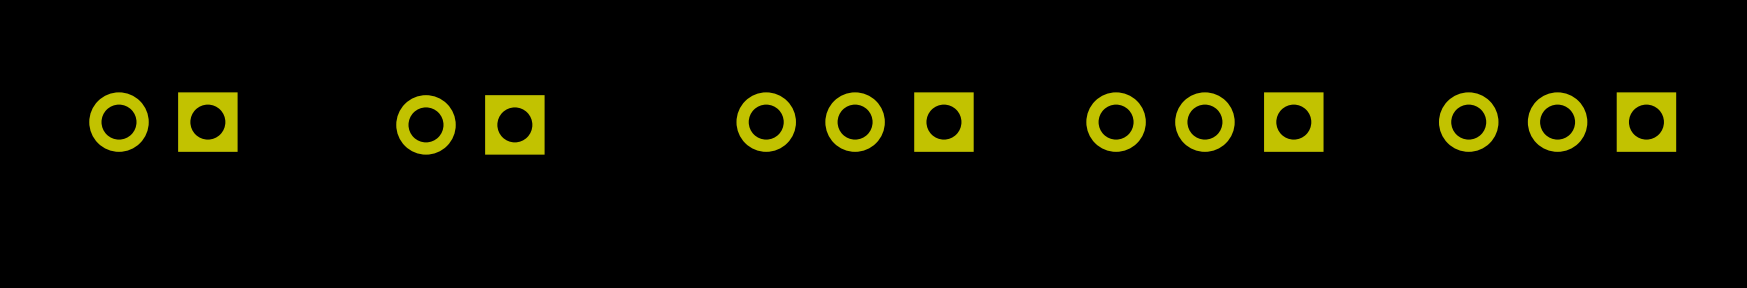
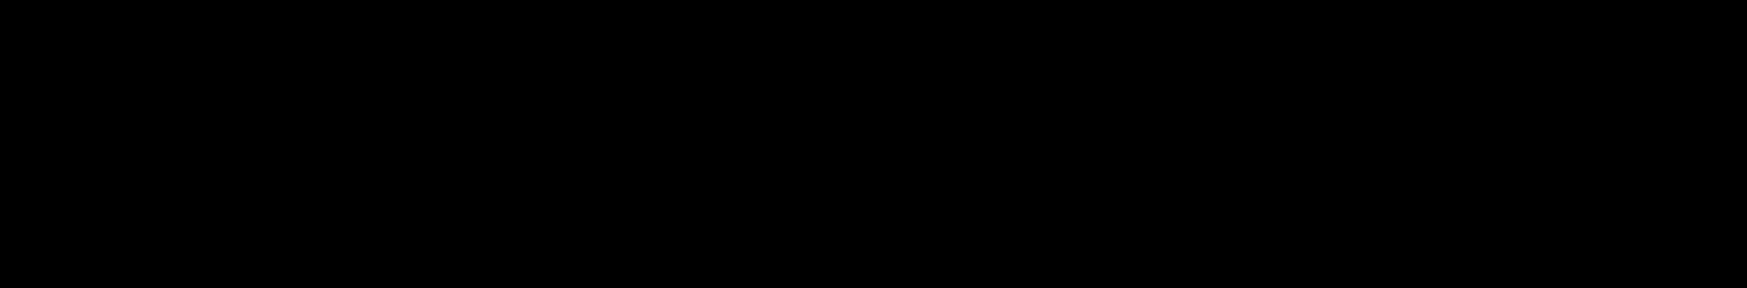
part: (163, 122) -> none
part: (855, 122) -> none
part: (1204, 122) -> none
part: (1557, 122) -> none
part: (470, 124) -> none

